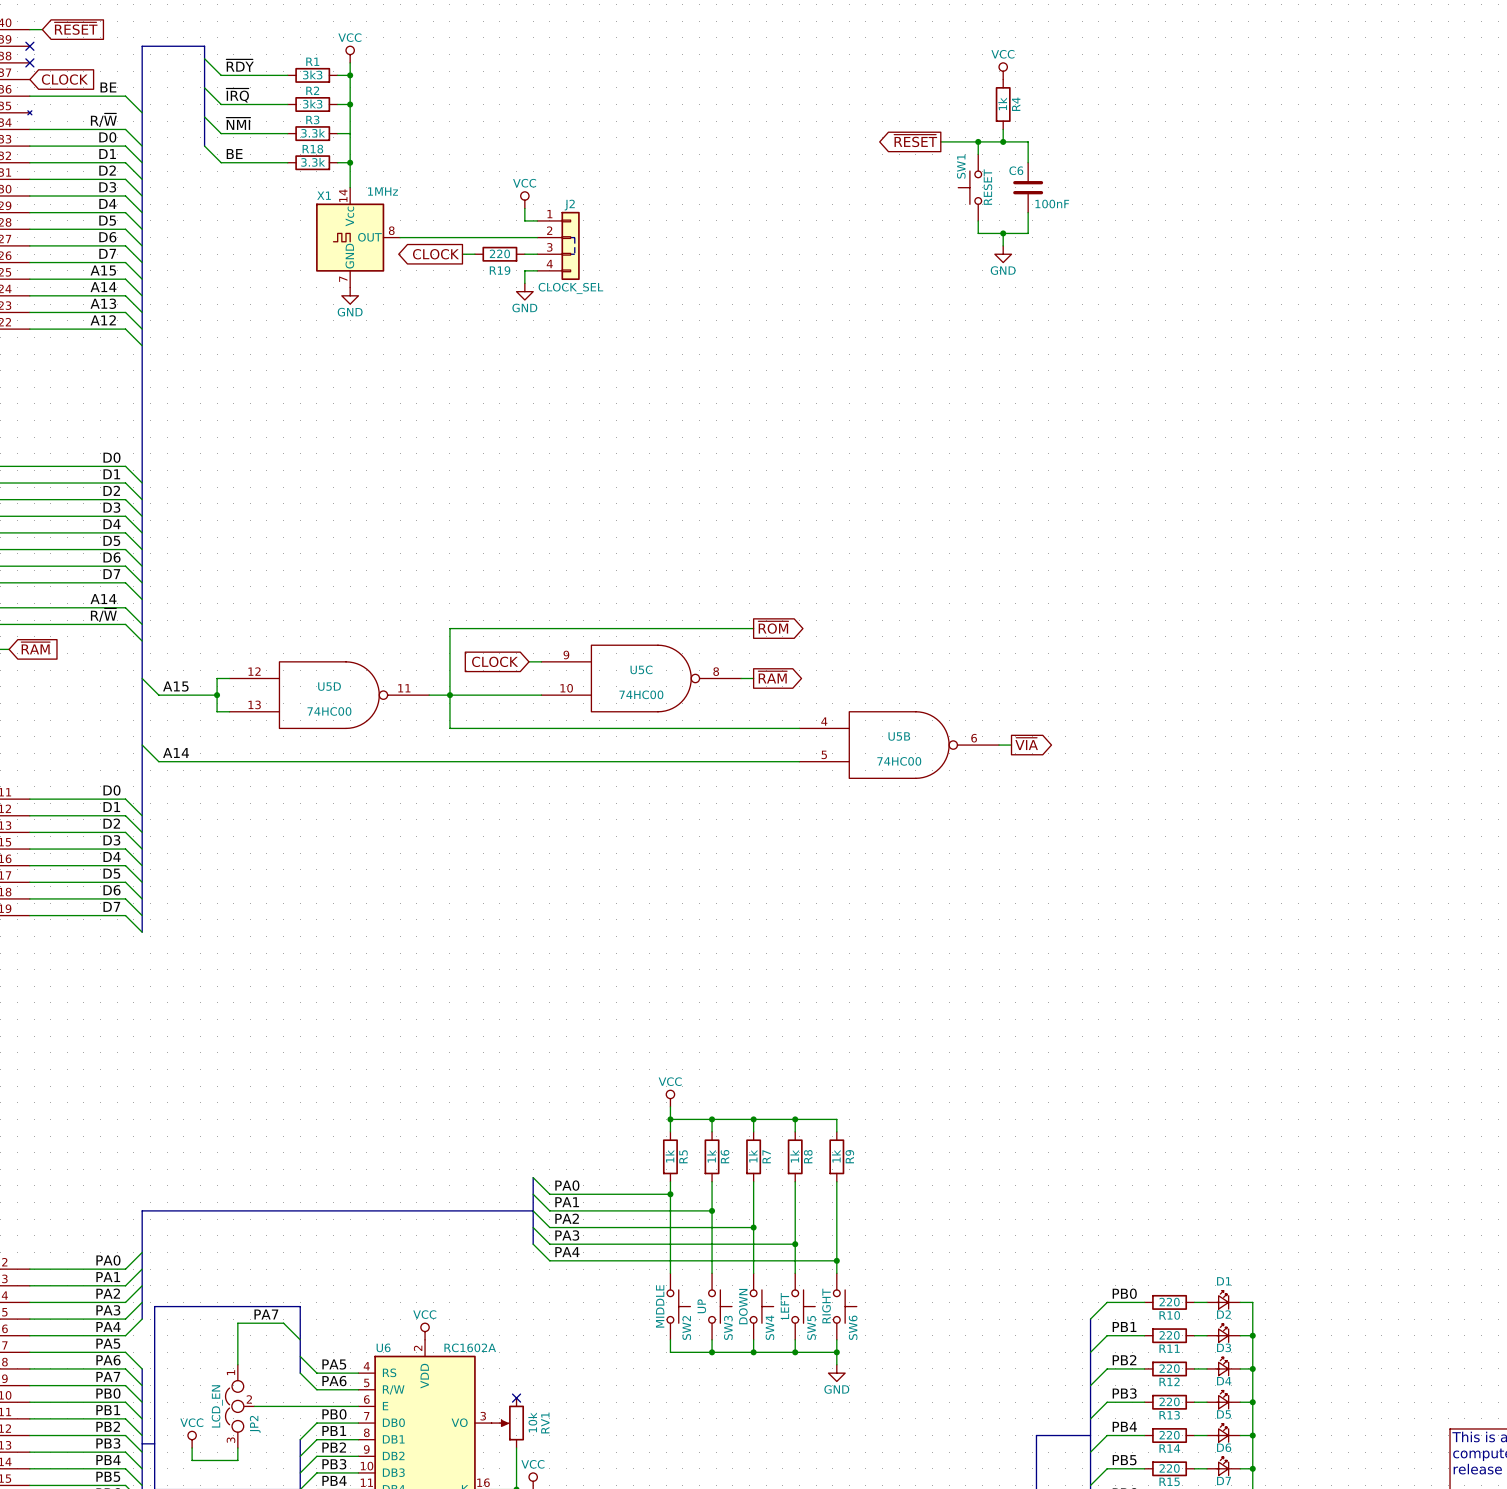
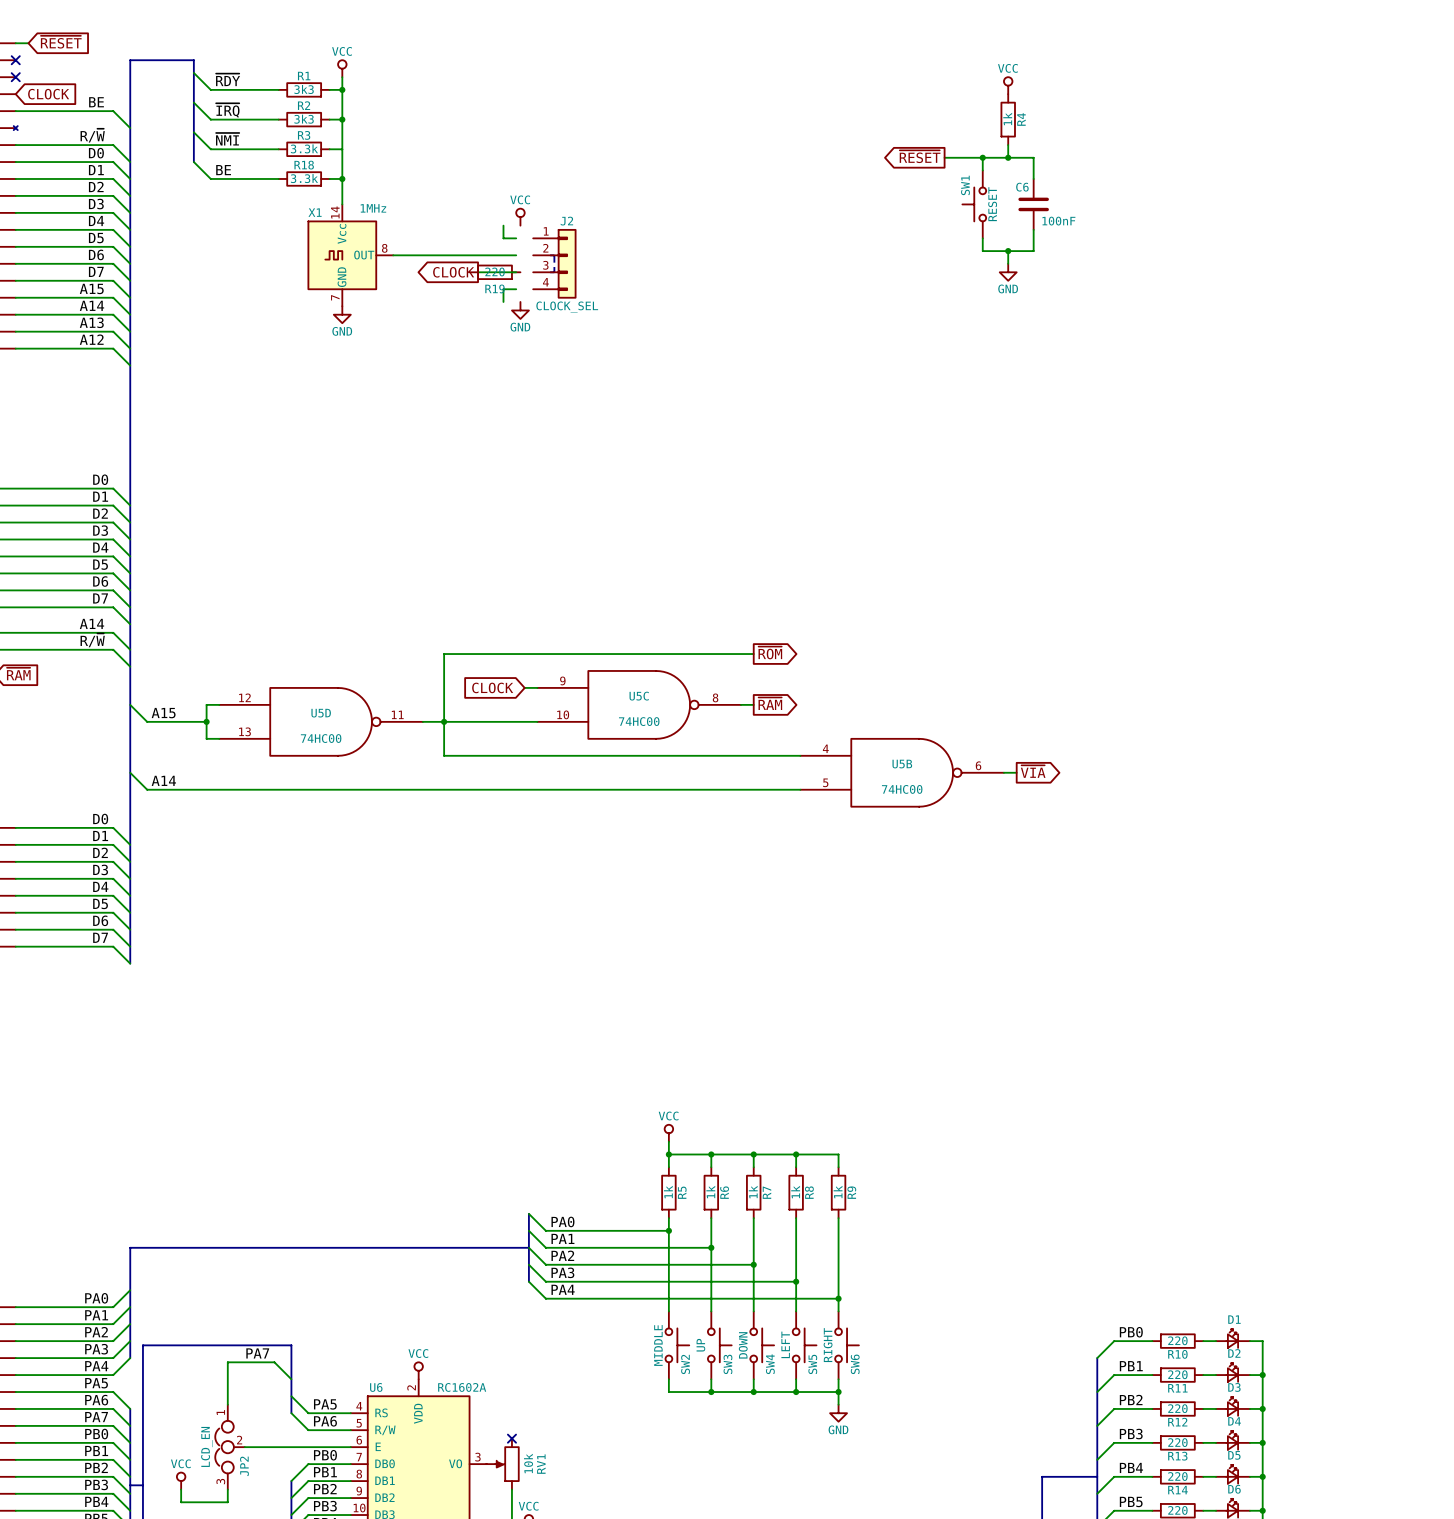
wire: (524, 208) (524, 220) (537, 220) -> (503, 225) (503, 238) (516, 238)
wire: (520, 237) (537, 237) -> none
line: (570, 237) (574, 237) (574, 254) (570, 254) -> (550, 255) (554, 255) (554, 272) (550, 272)
global label position: CLOCK (435, 254) -> CLOCK (453, 272)
wire: (462, 254) (474, 254) -> none
wire: none -> (478, 272) (516, 272)
wire: (524, 254) (537, 254) -> none
wire: (537, 270) (524, 270) (524, 283) -> (516, 289) (503, 289) (503, 301)

